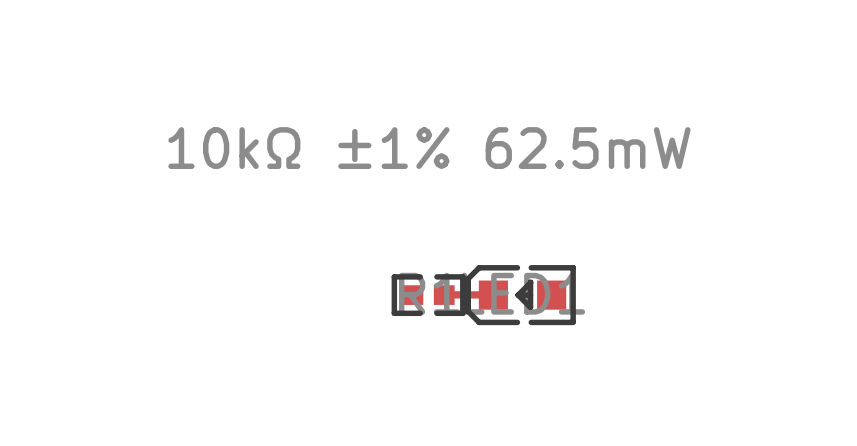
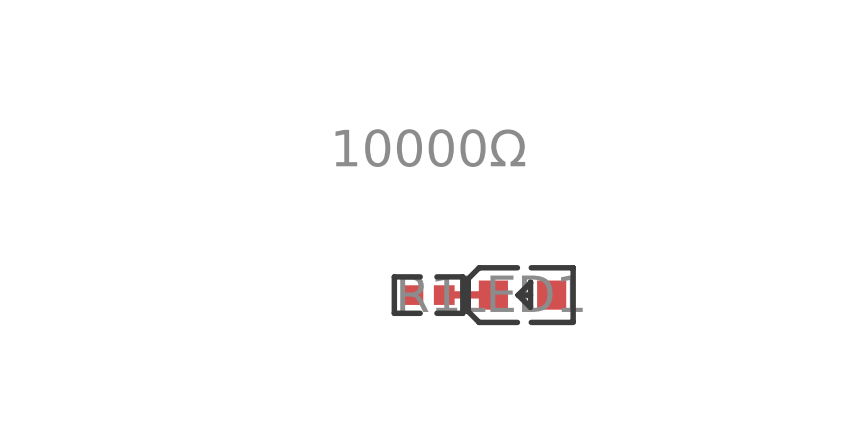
part value: 10kΩ ±1% 62.5mW (429, 148) -> 10000Ω (430, 148)

